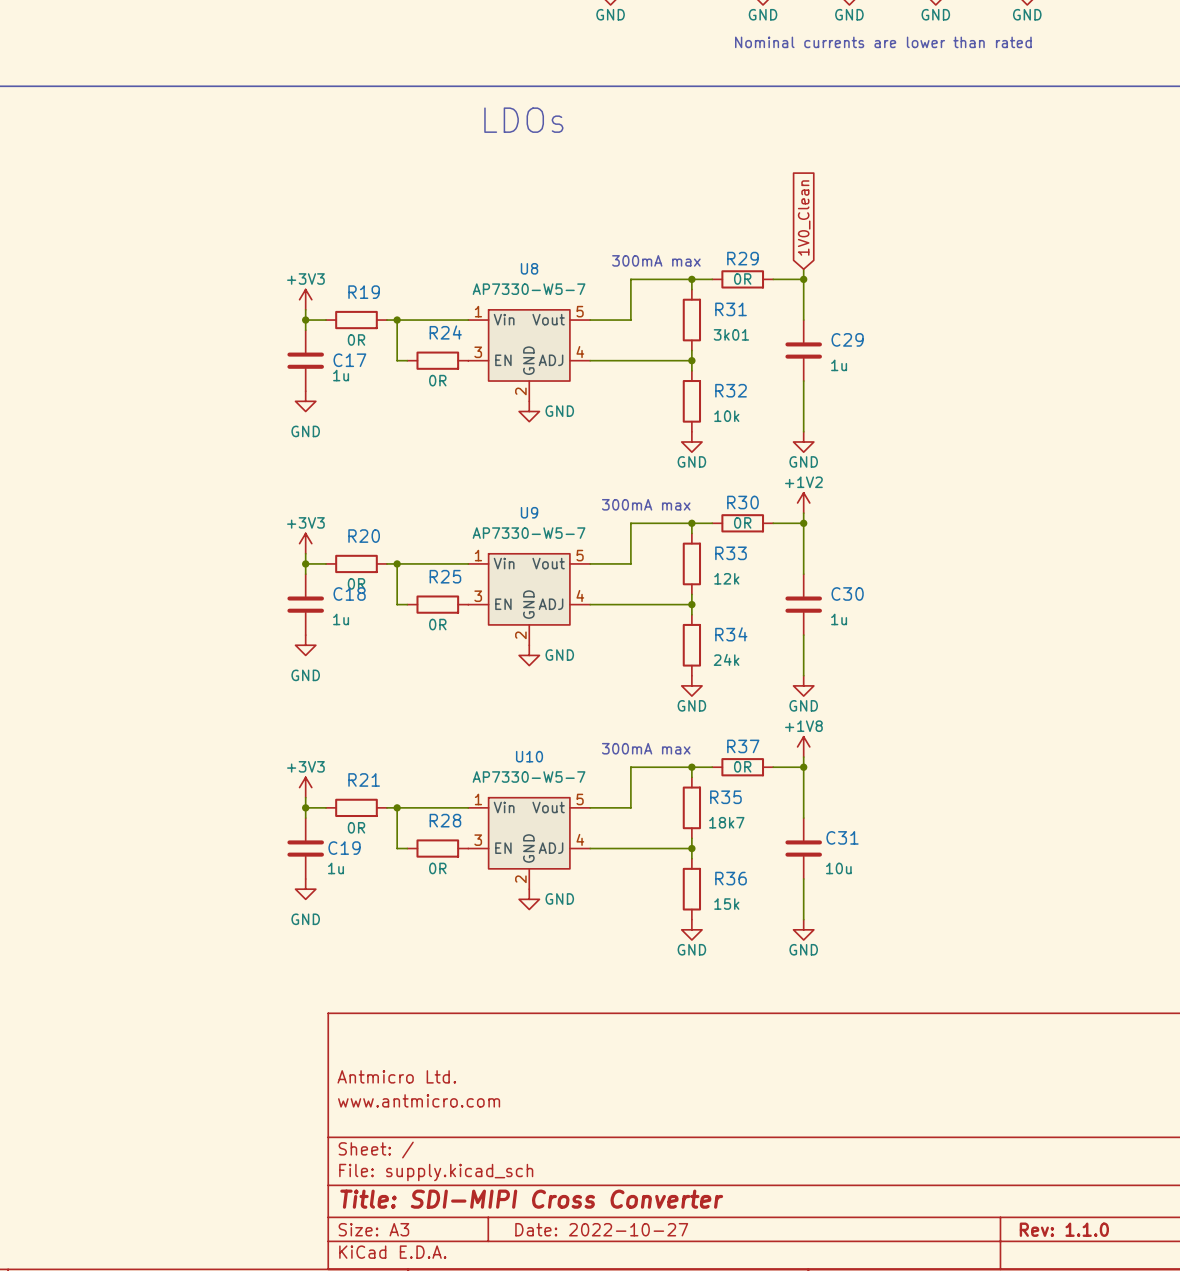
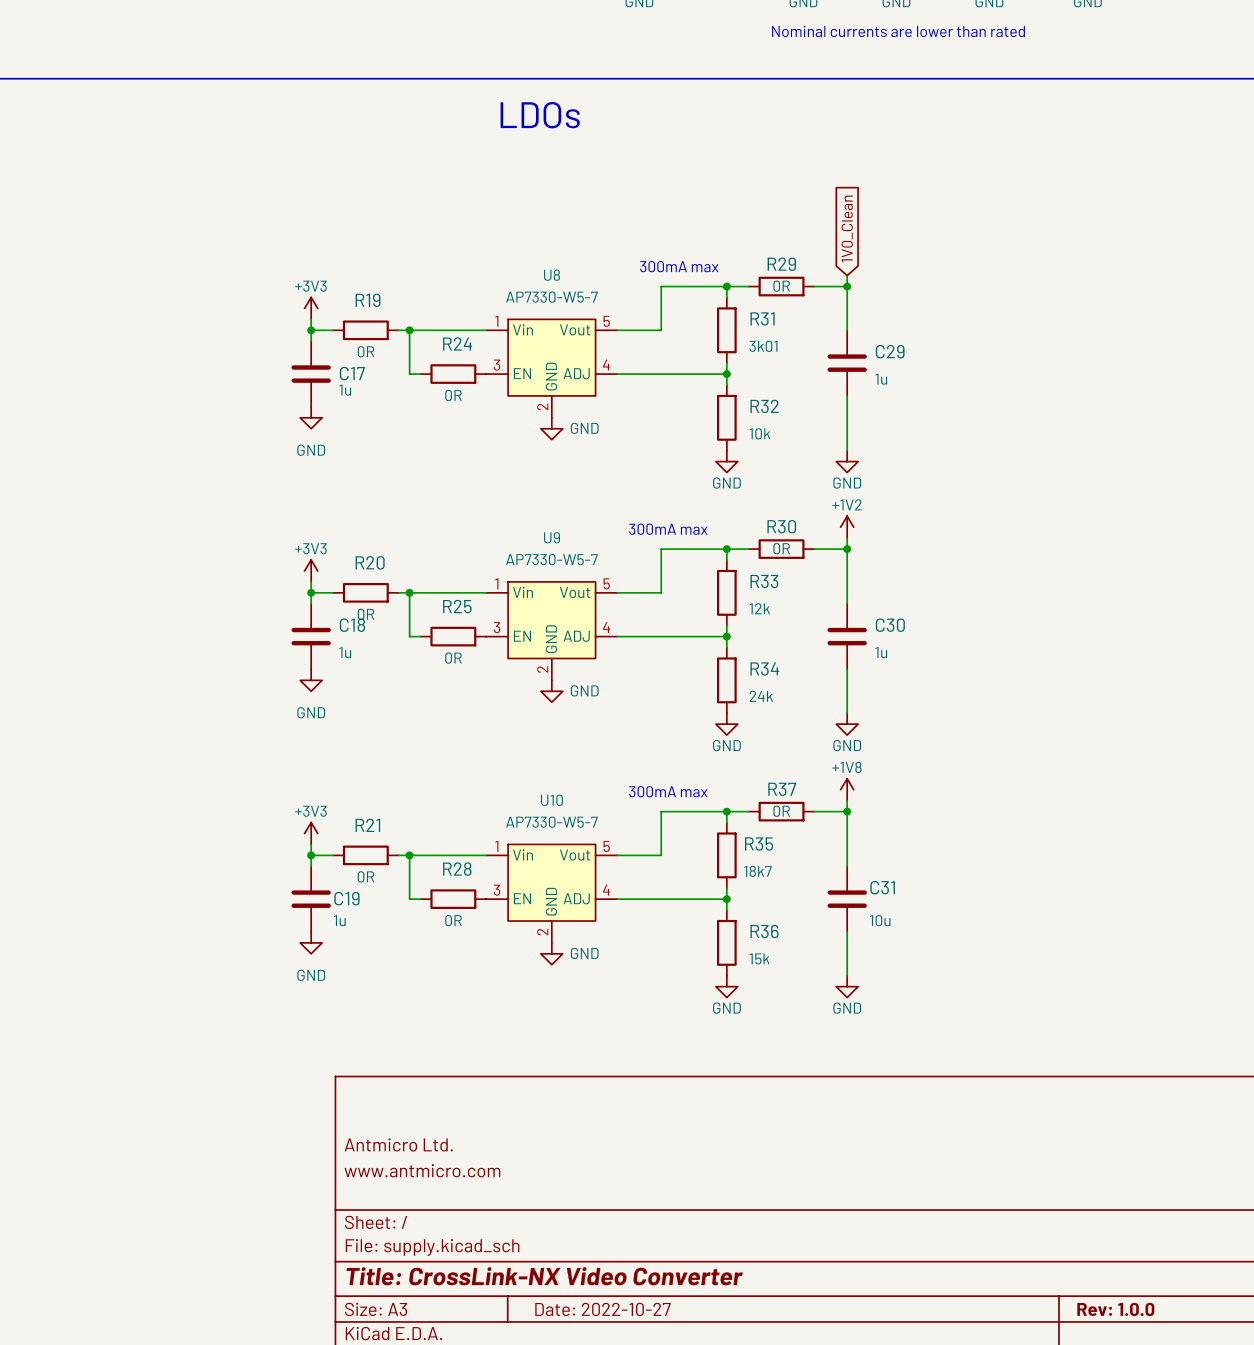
title block: Title: SDI-MIPI Cross Converter (531, 1199) -> Title: CrossLink-NX Video Converter (544, 1276)
title block: Rev: 1.1.0 (1064, 1229) -> Rev: 1.0.0 (1115, 1309)

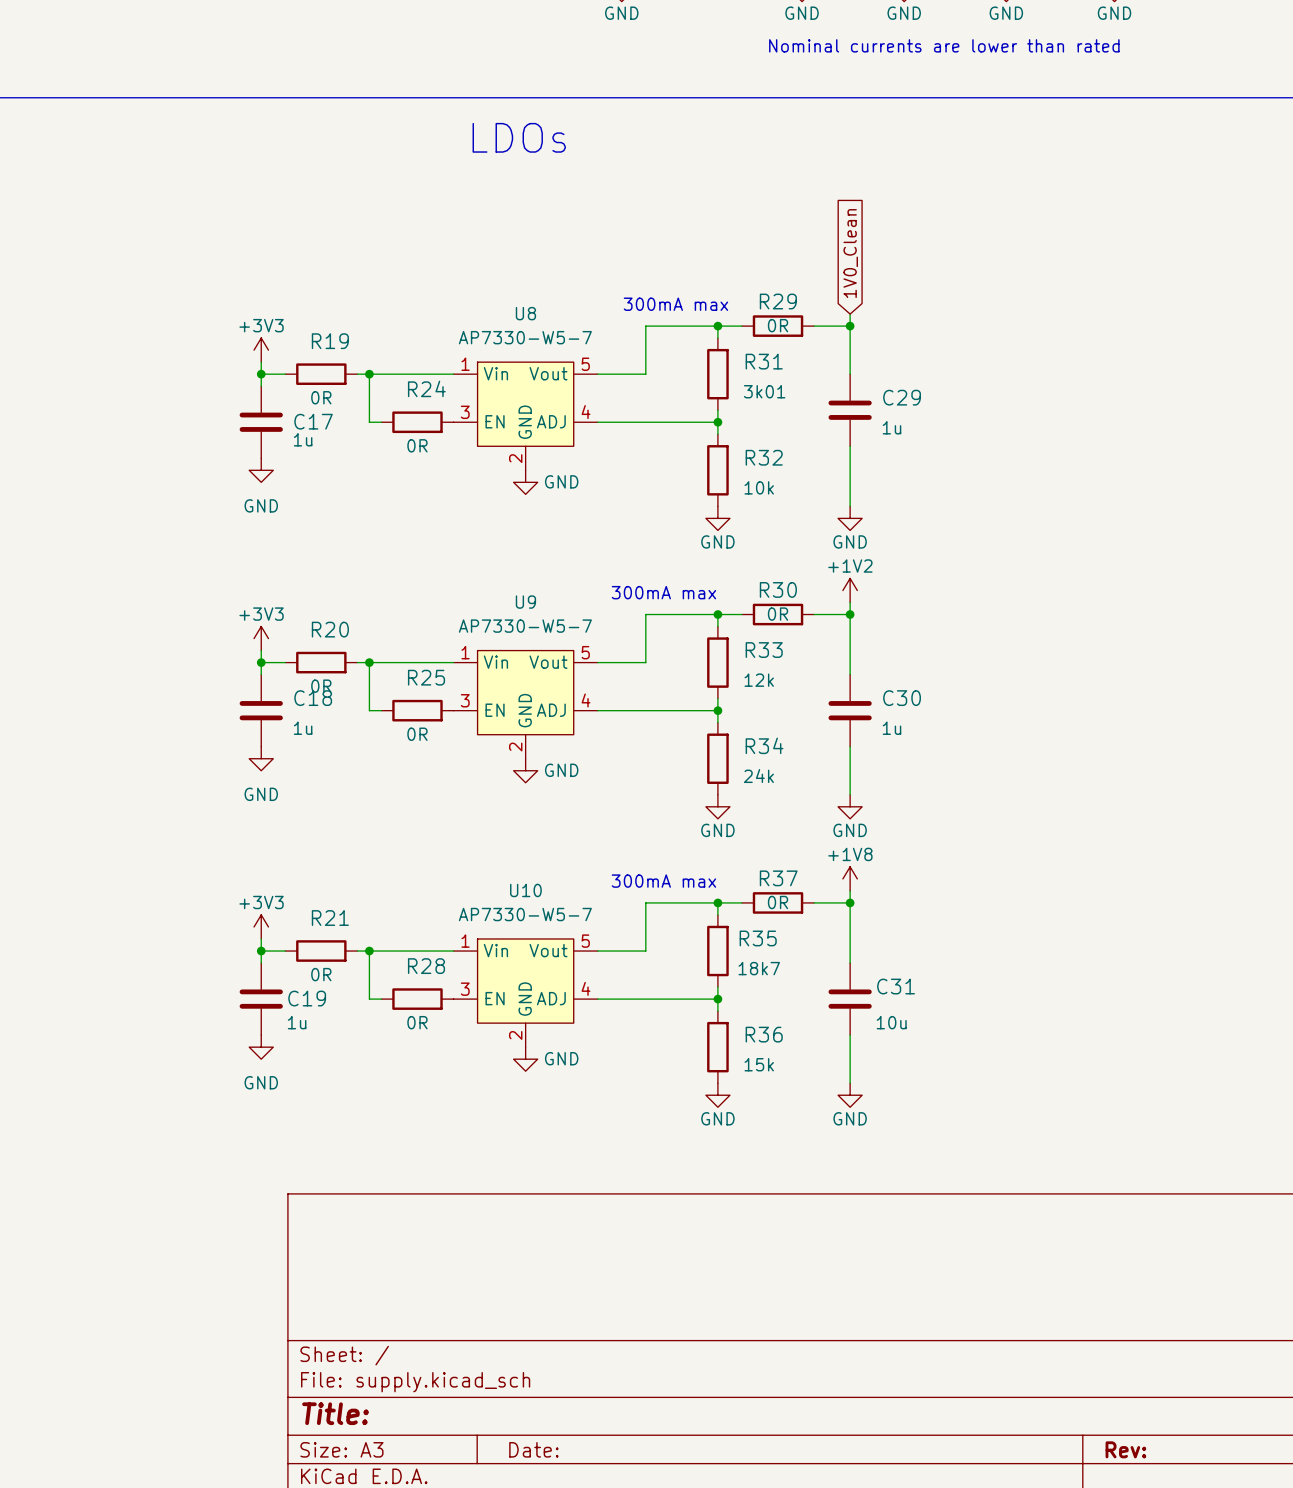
title block: Antmicro Ltd. (398, 1144) -> none
title block: www.antmicro.com (422, 1170) -> none
title block: Title: CrossLink-NX Video Converter (544, 1276) -> Title: (335, 1413)
title block: Date: 2022-10-27 (602, 1309) -> Date: (533, 1449)
title block: Rev: 1.0.0 (1115, 1309) -> Rev: (1125, 1449)

